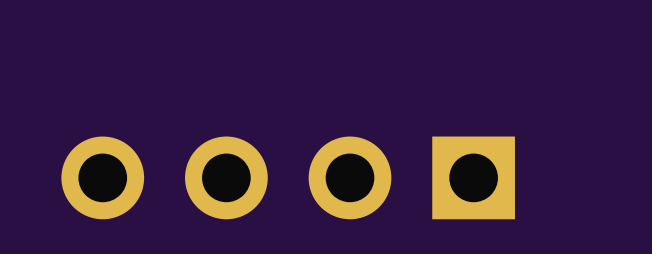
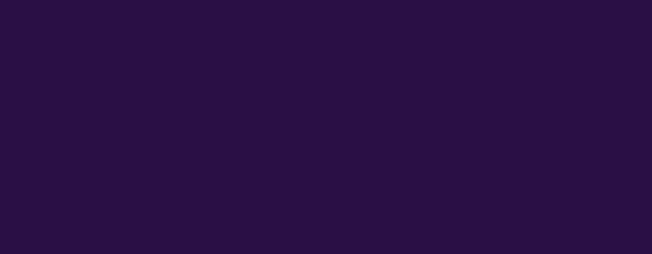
part: (288, 177) -> none

